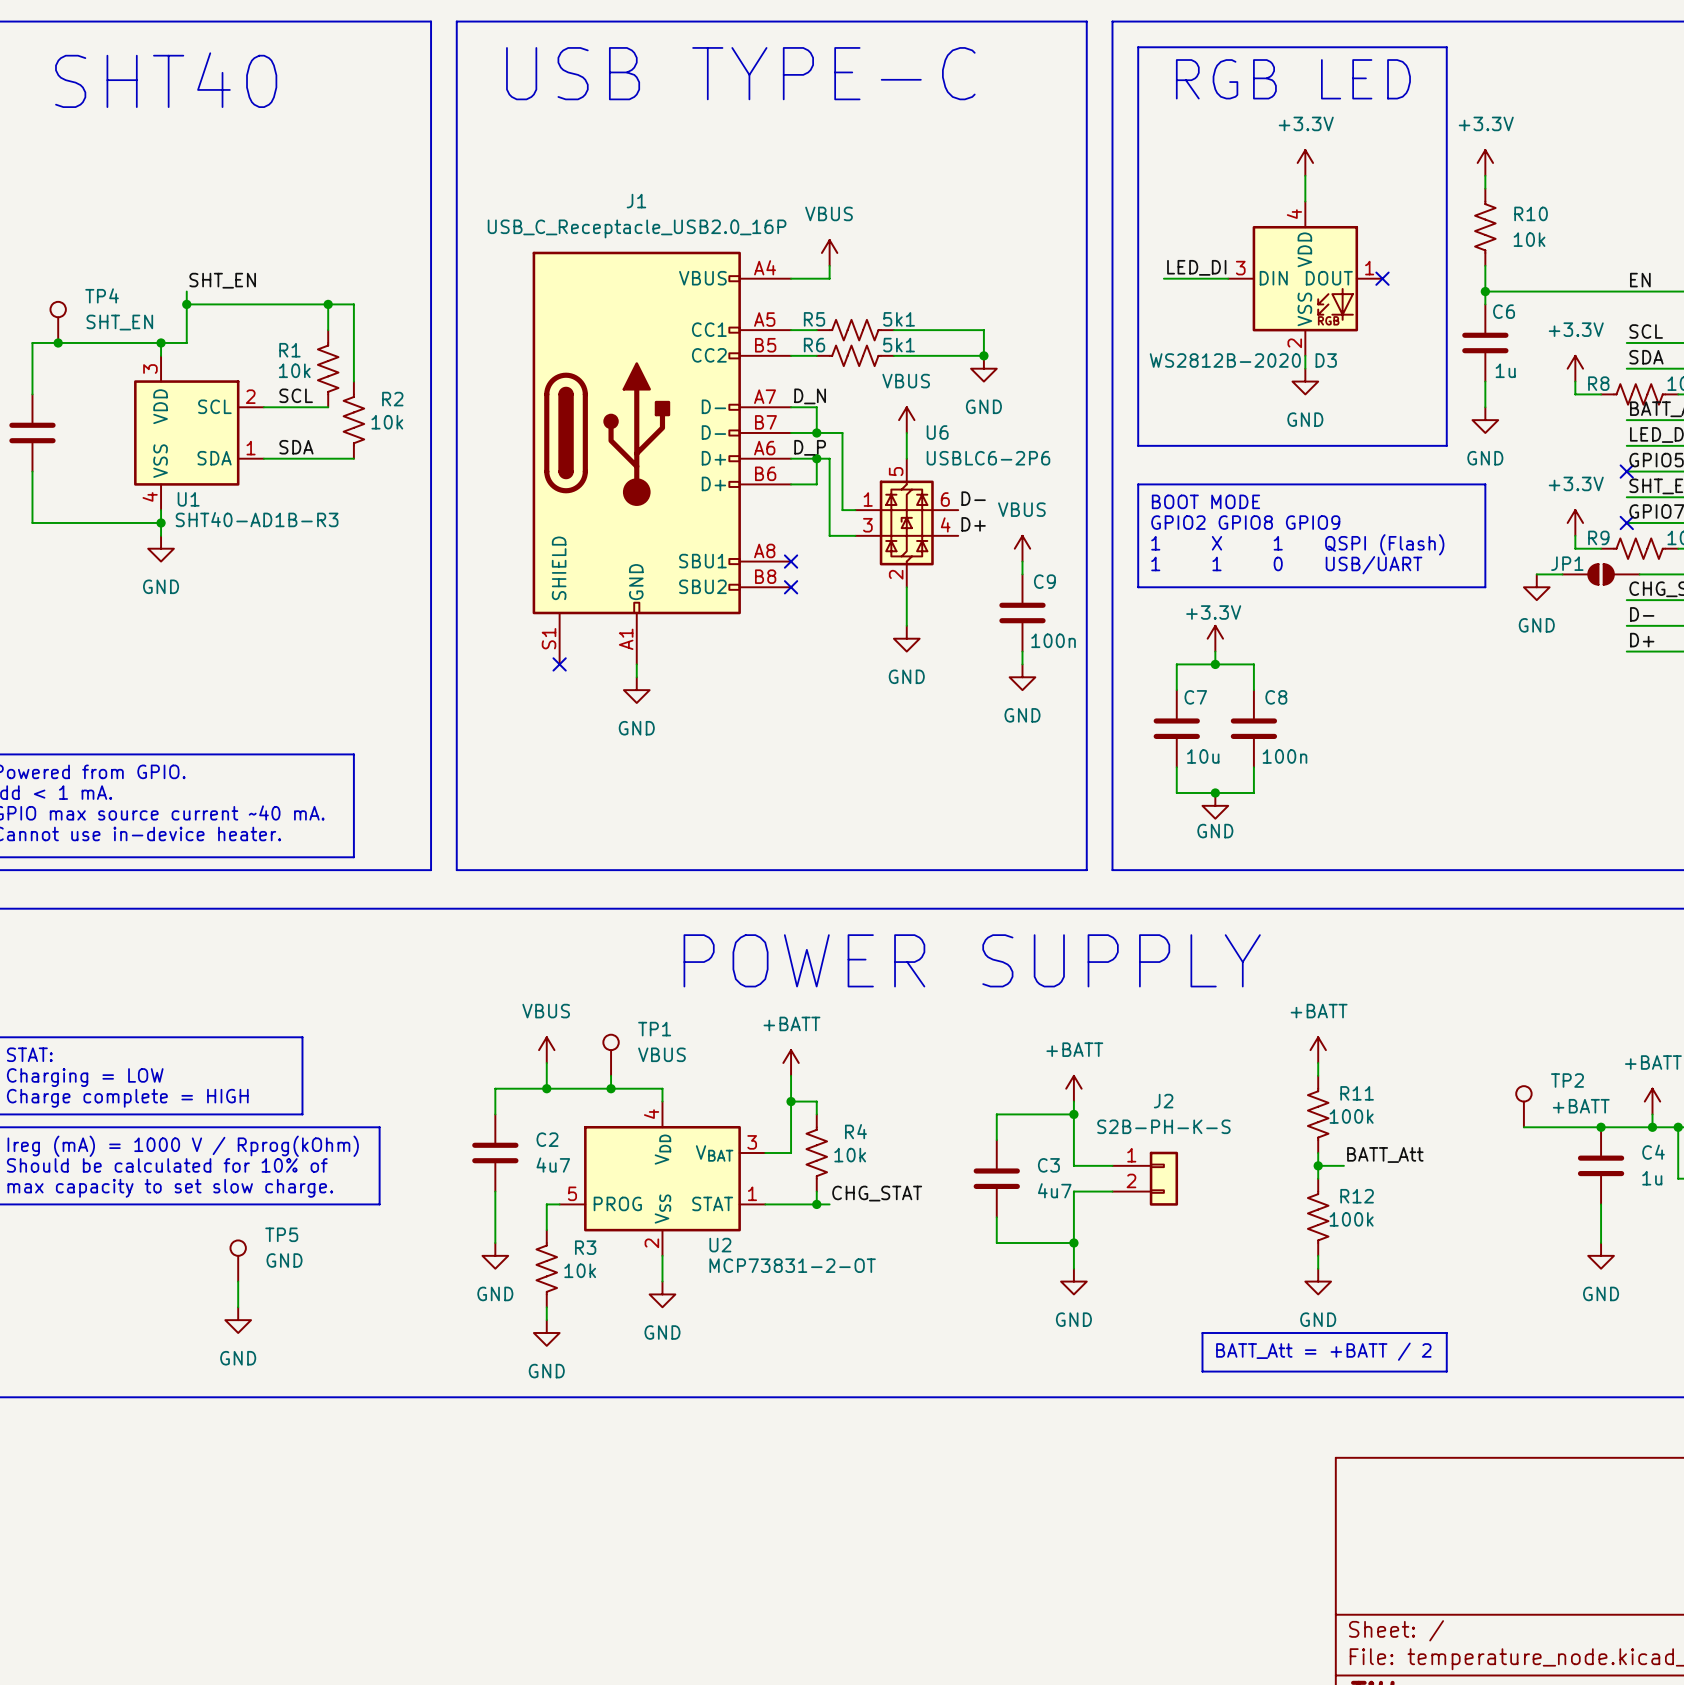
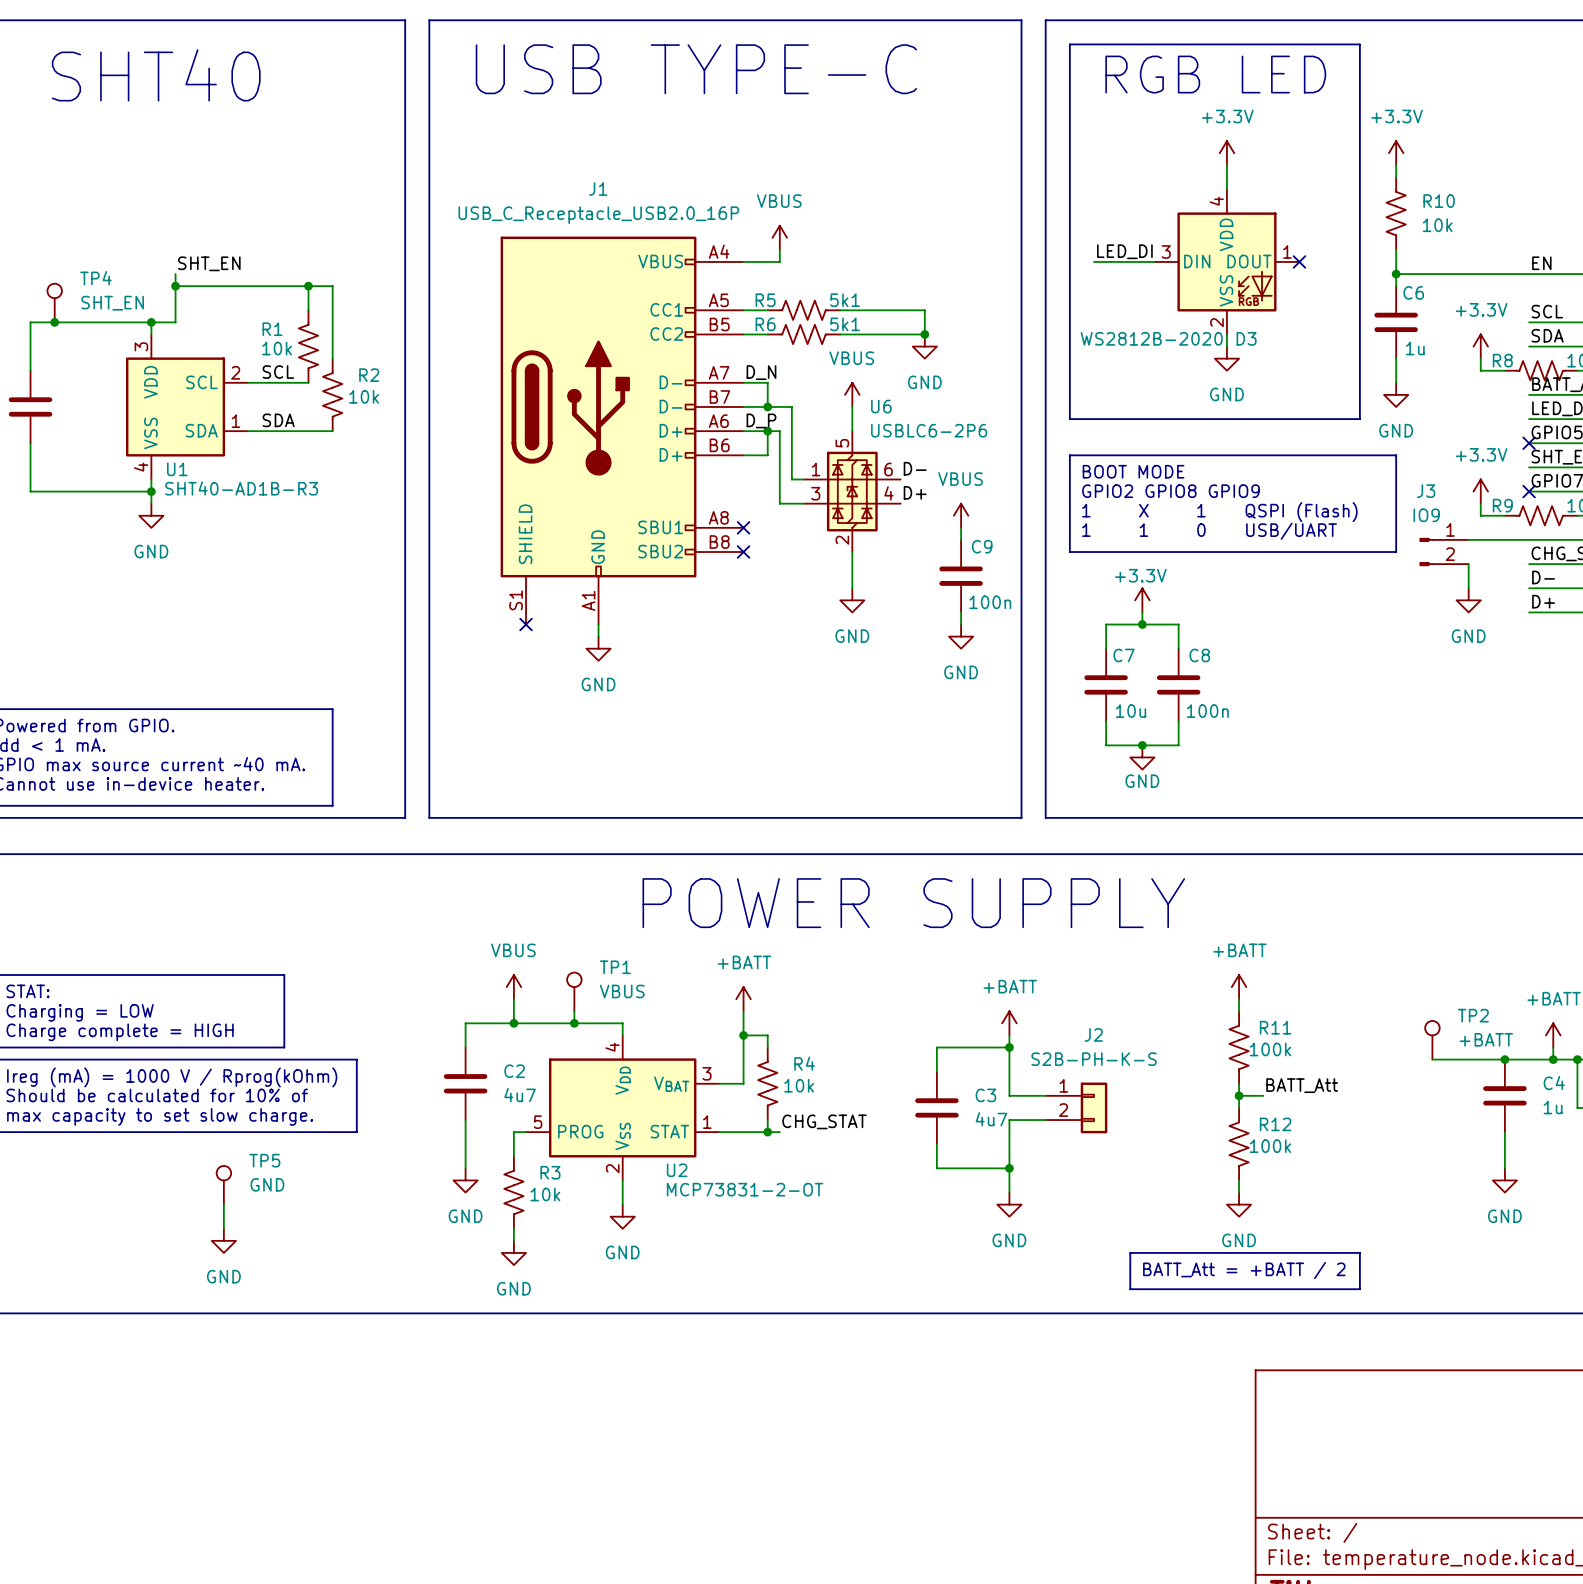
JP1: (1601, 574) -> none
power symbol position: GND (1536, 587) -> GND (1468, 600)
J3: none -> IO9 (1444, 552)
wire: none -> (1468, 564) (1468, 588)

